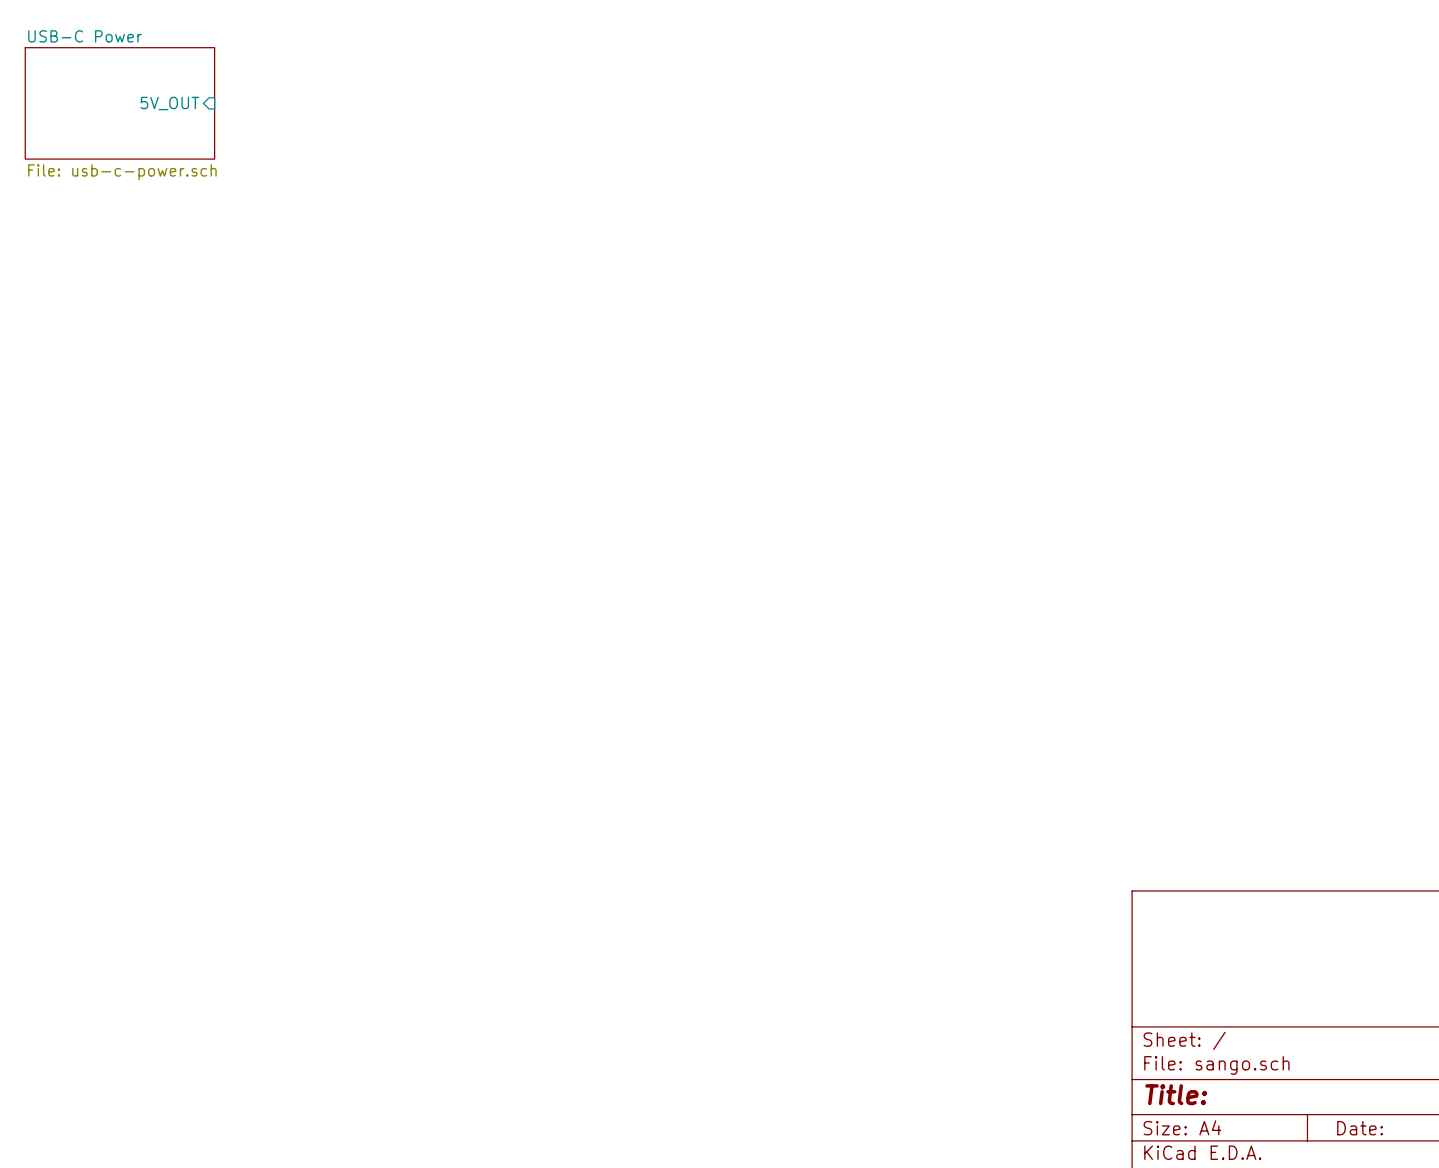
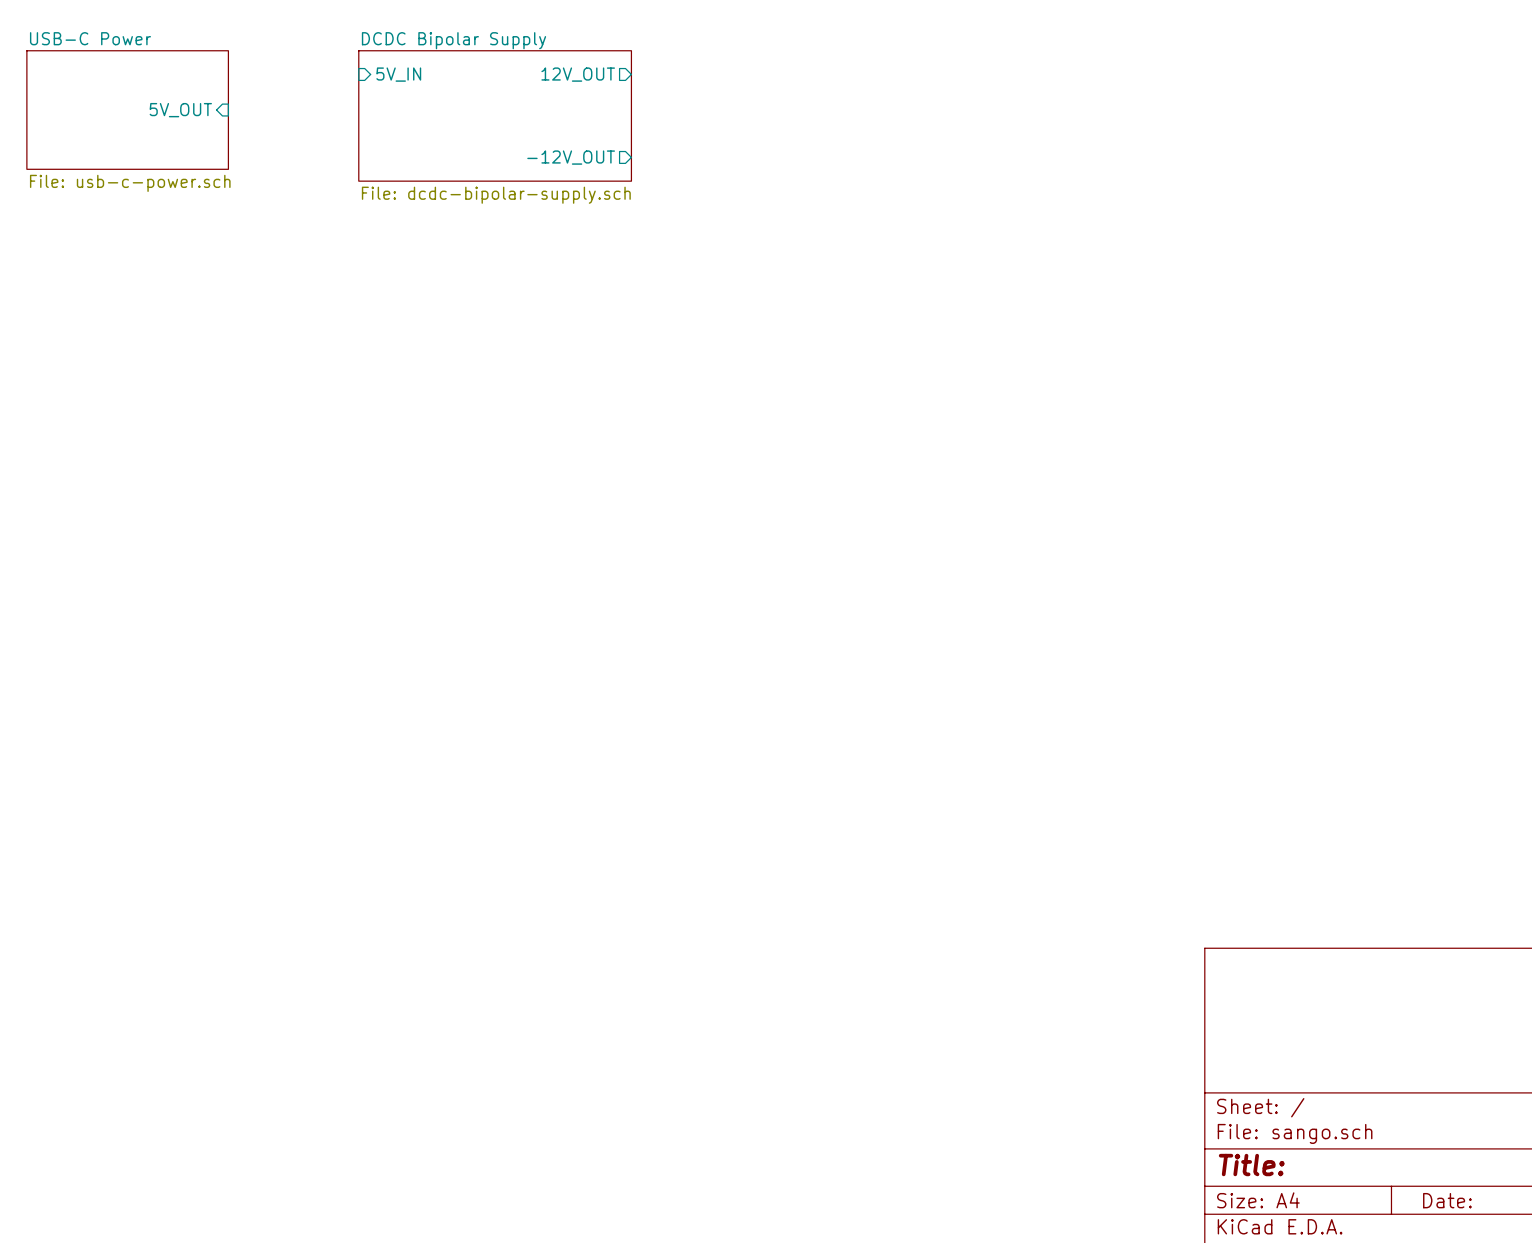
sheet pin: none -> 5V_IN (398, 74)
sheet pin: none -> 12V_OUT (578, 74)
sheet DCDC Bipolar Supply: none -> File: dcdc-bipolar-supply.sch (495, 115)
sheet pin: none -> -12V_OUT (571, 157)

